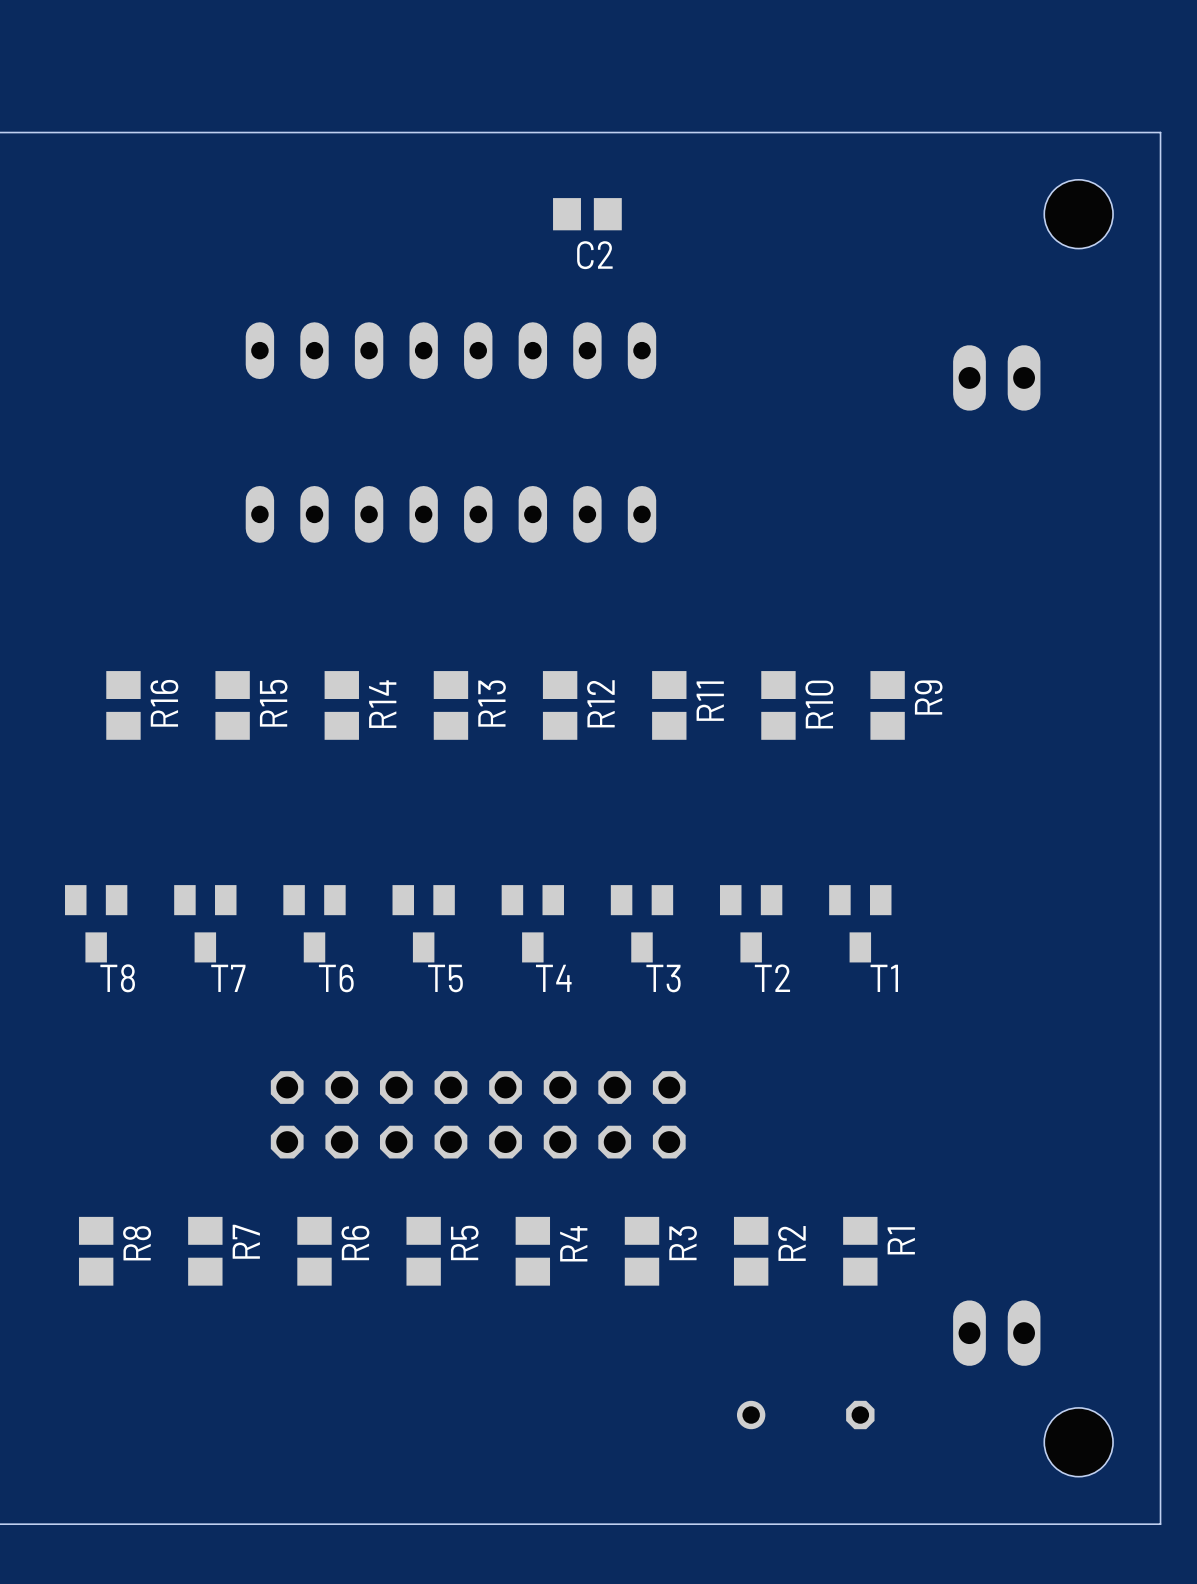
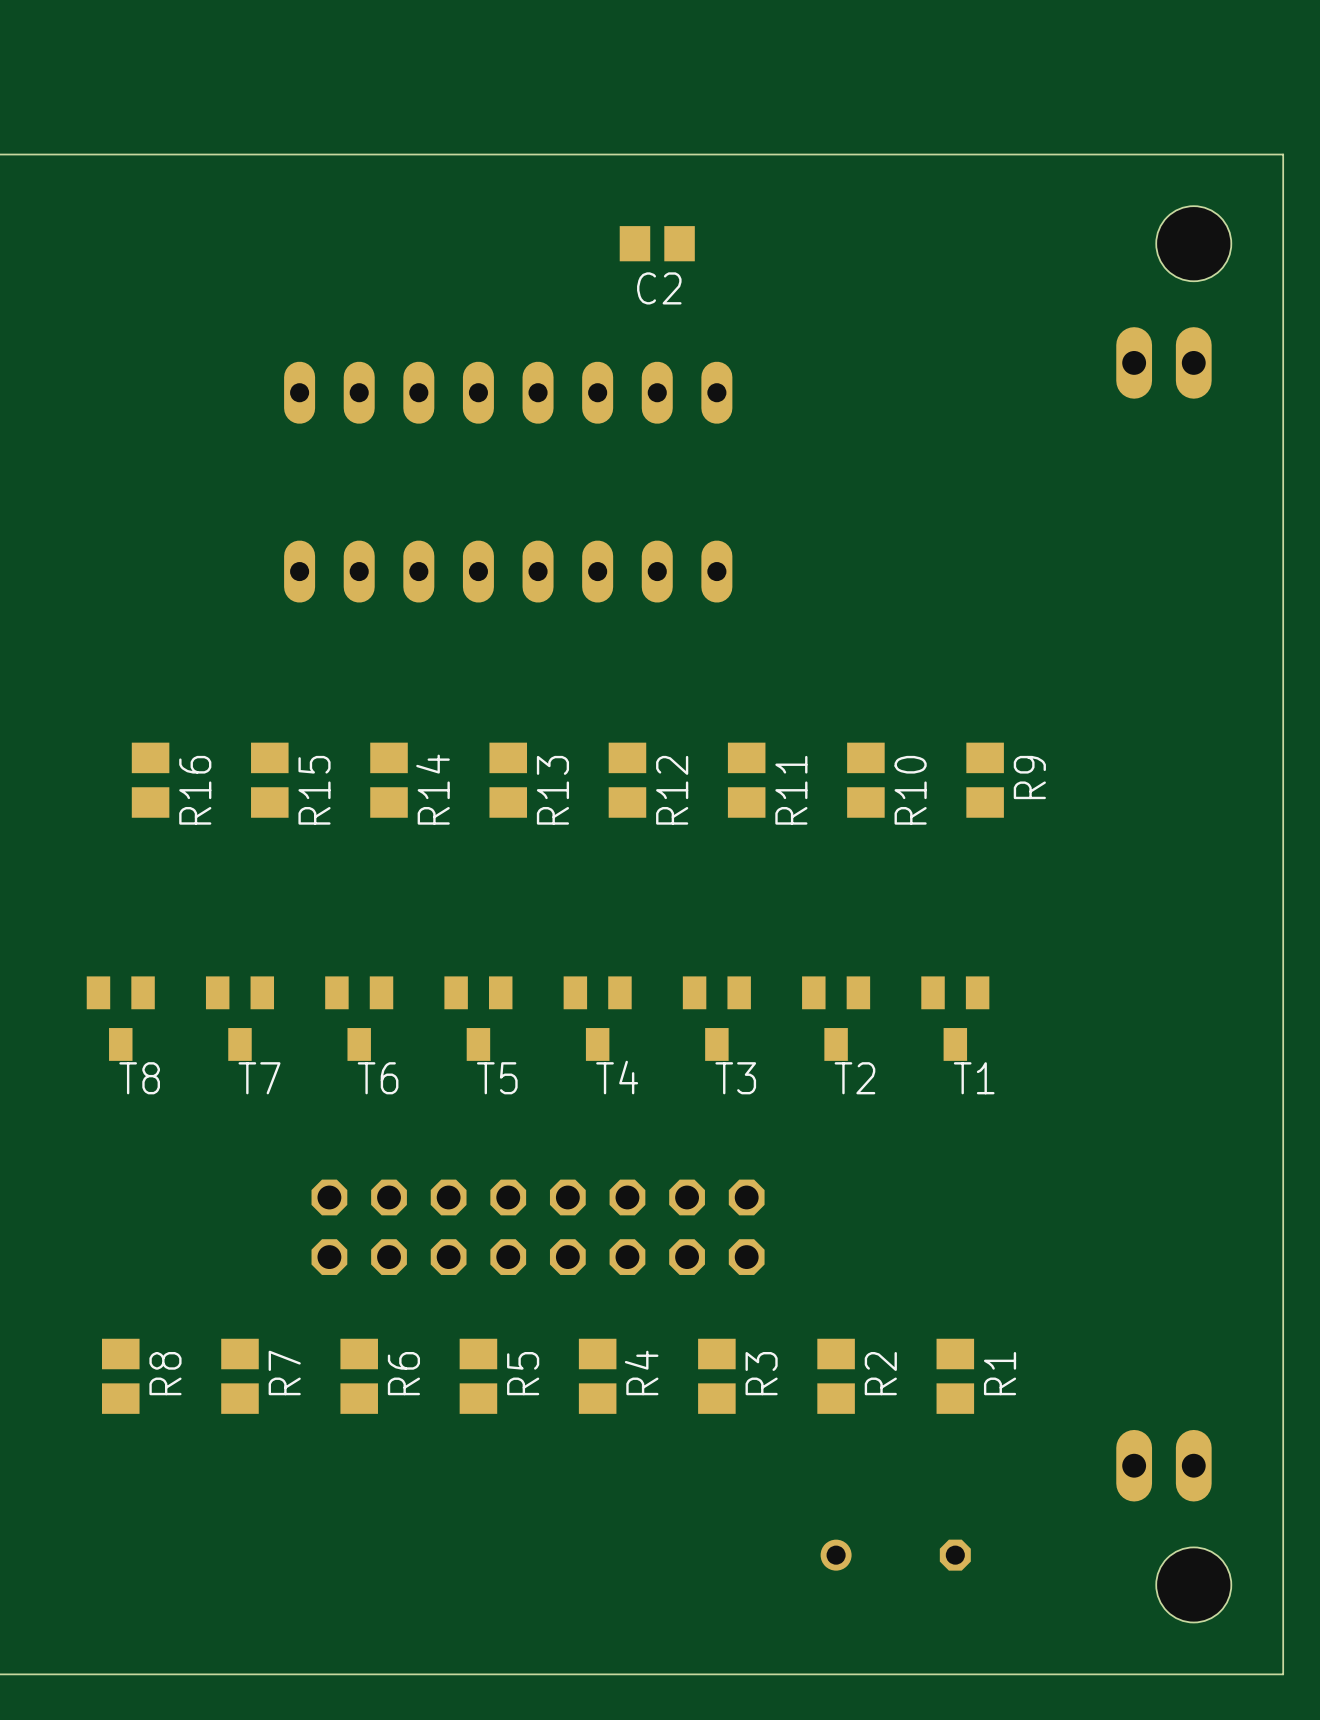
part position: (996, 377) -> (1163, 362)
part position: (996, 1333) -> (1163, 1465)

